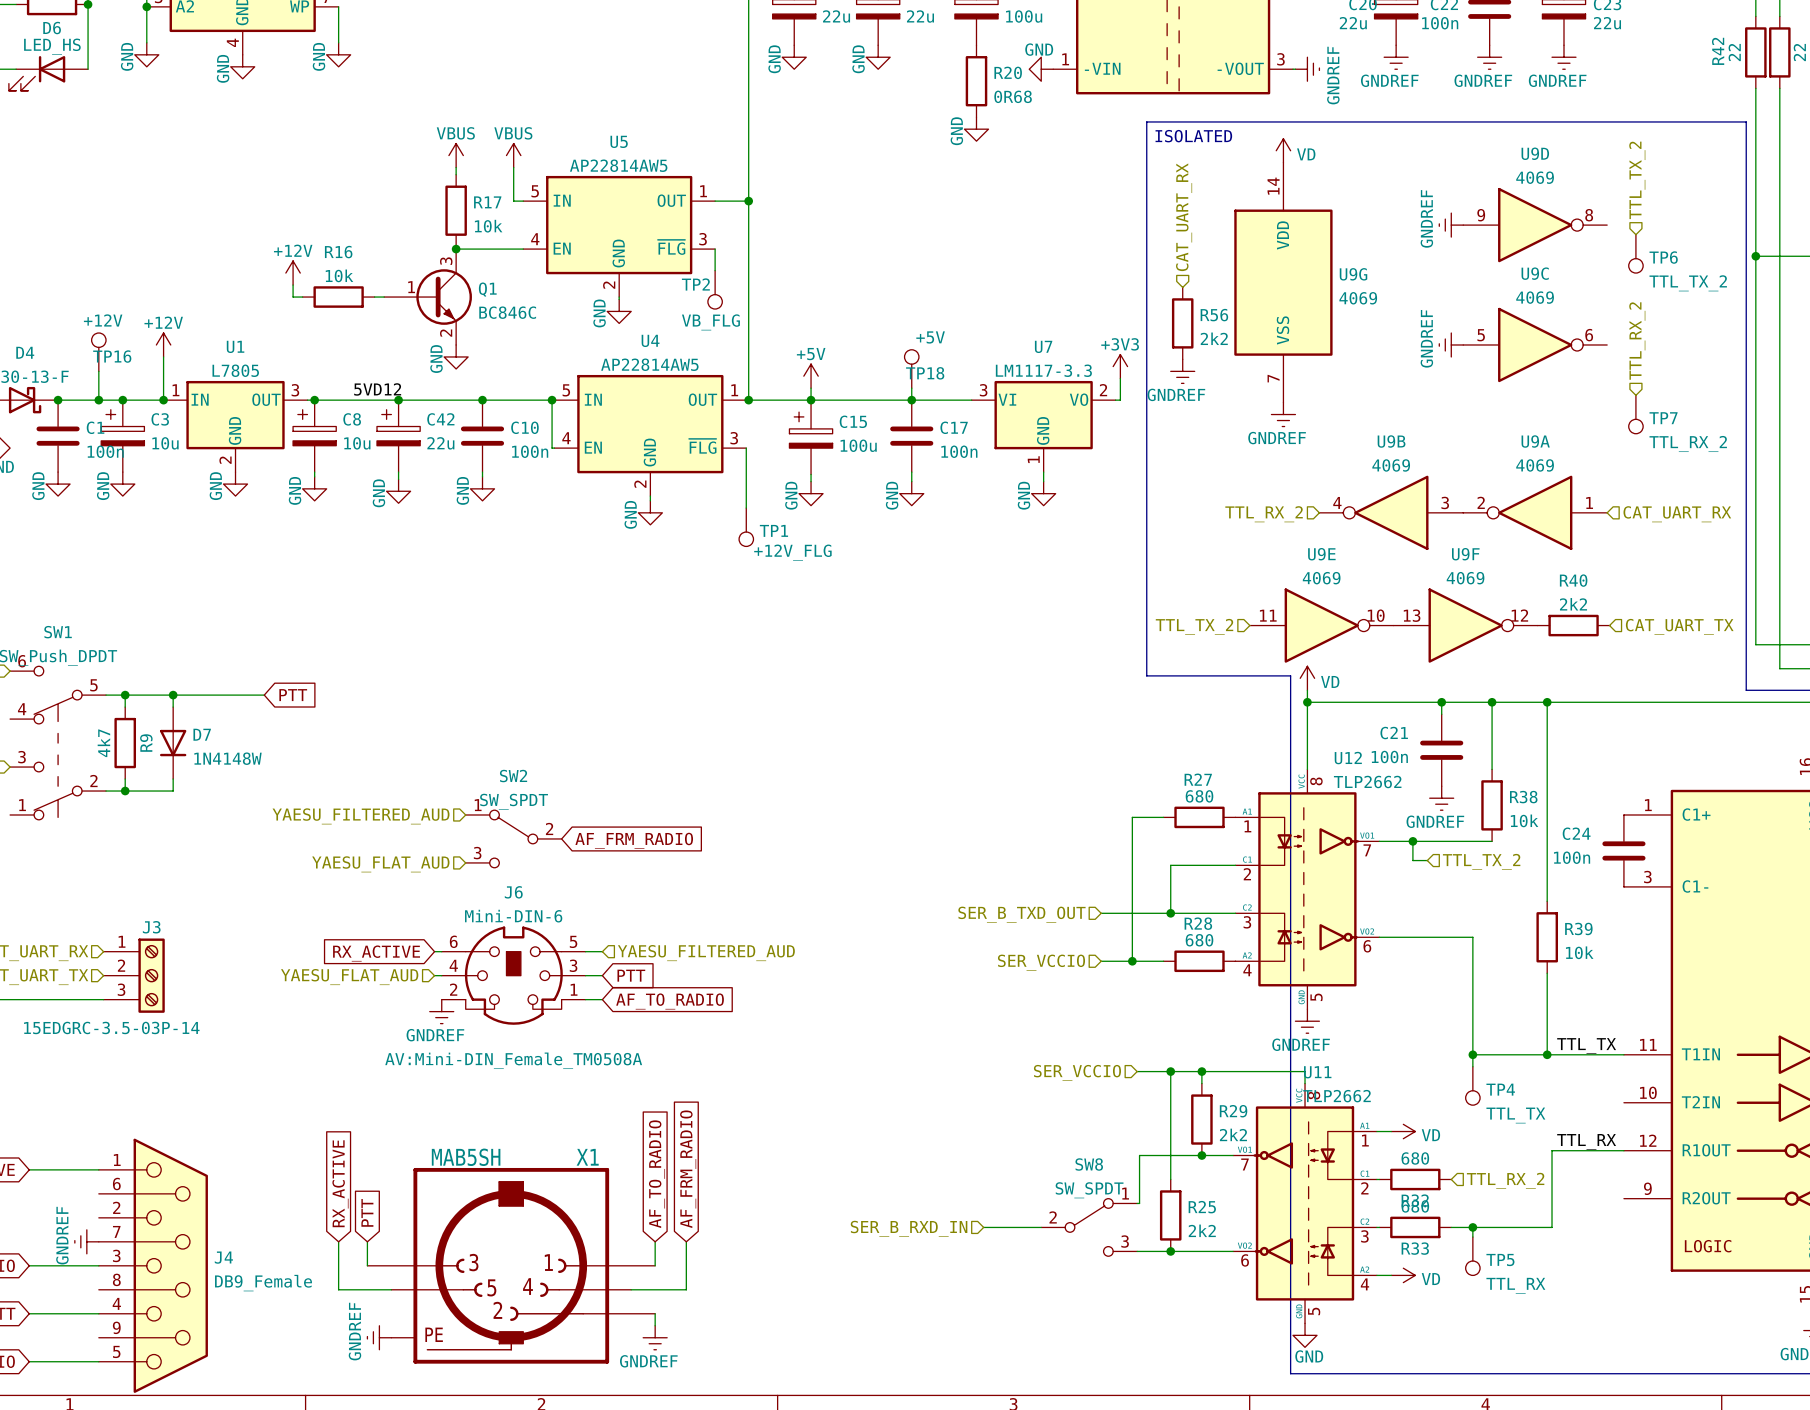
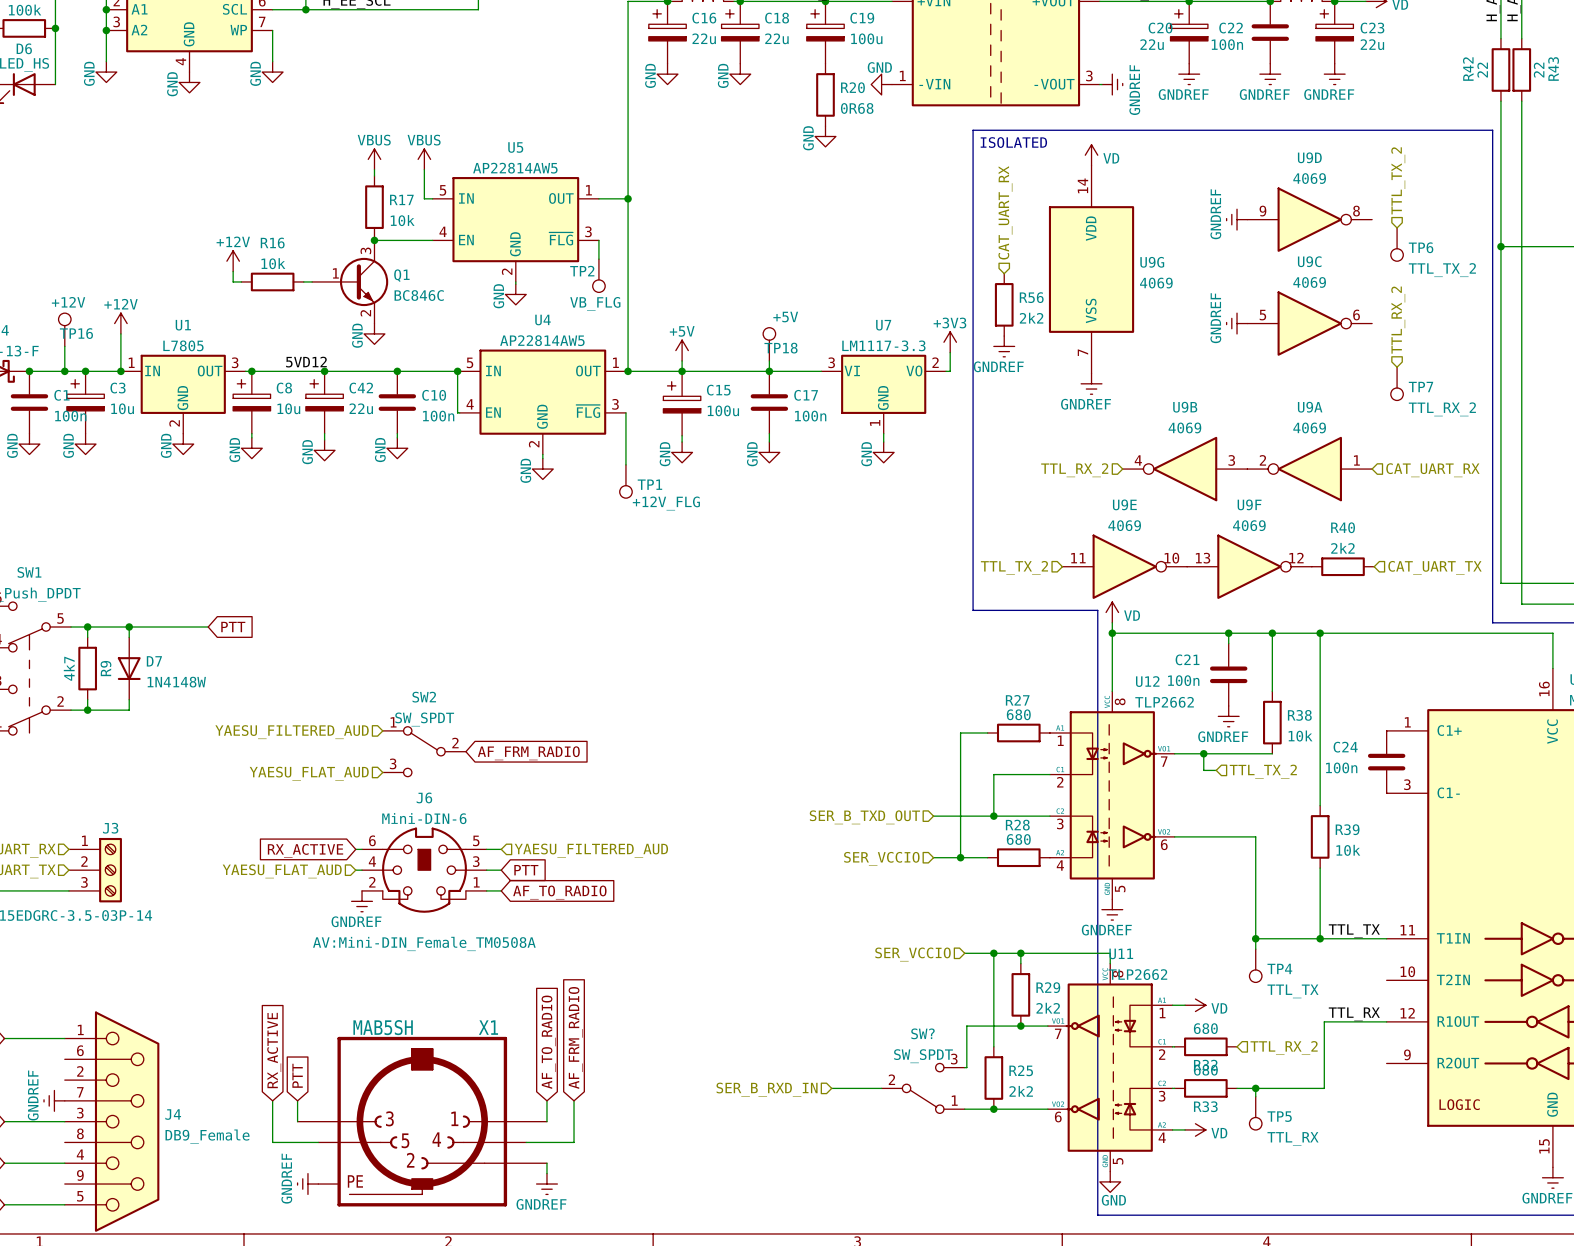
SW8: SW_SPDT (1089, 1227) -> none
SW?: none -> SW_SPDT (923, 1088)

